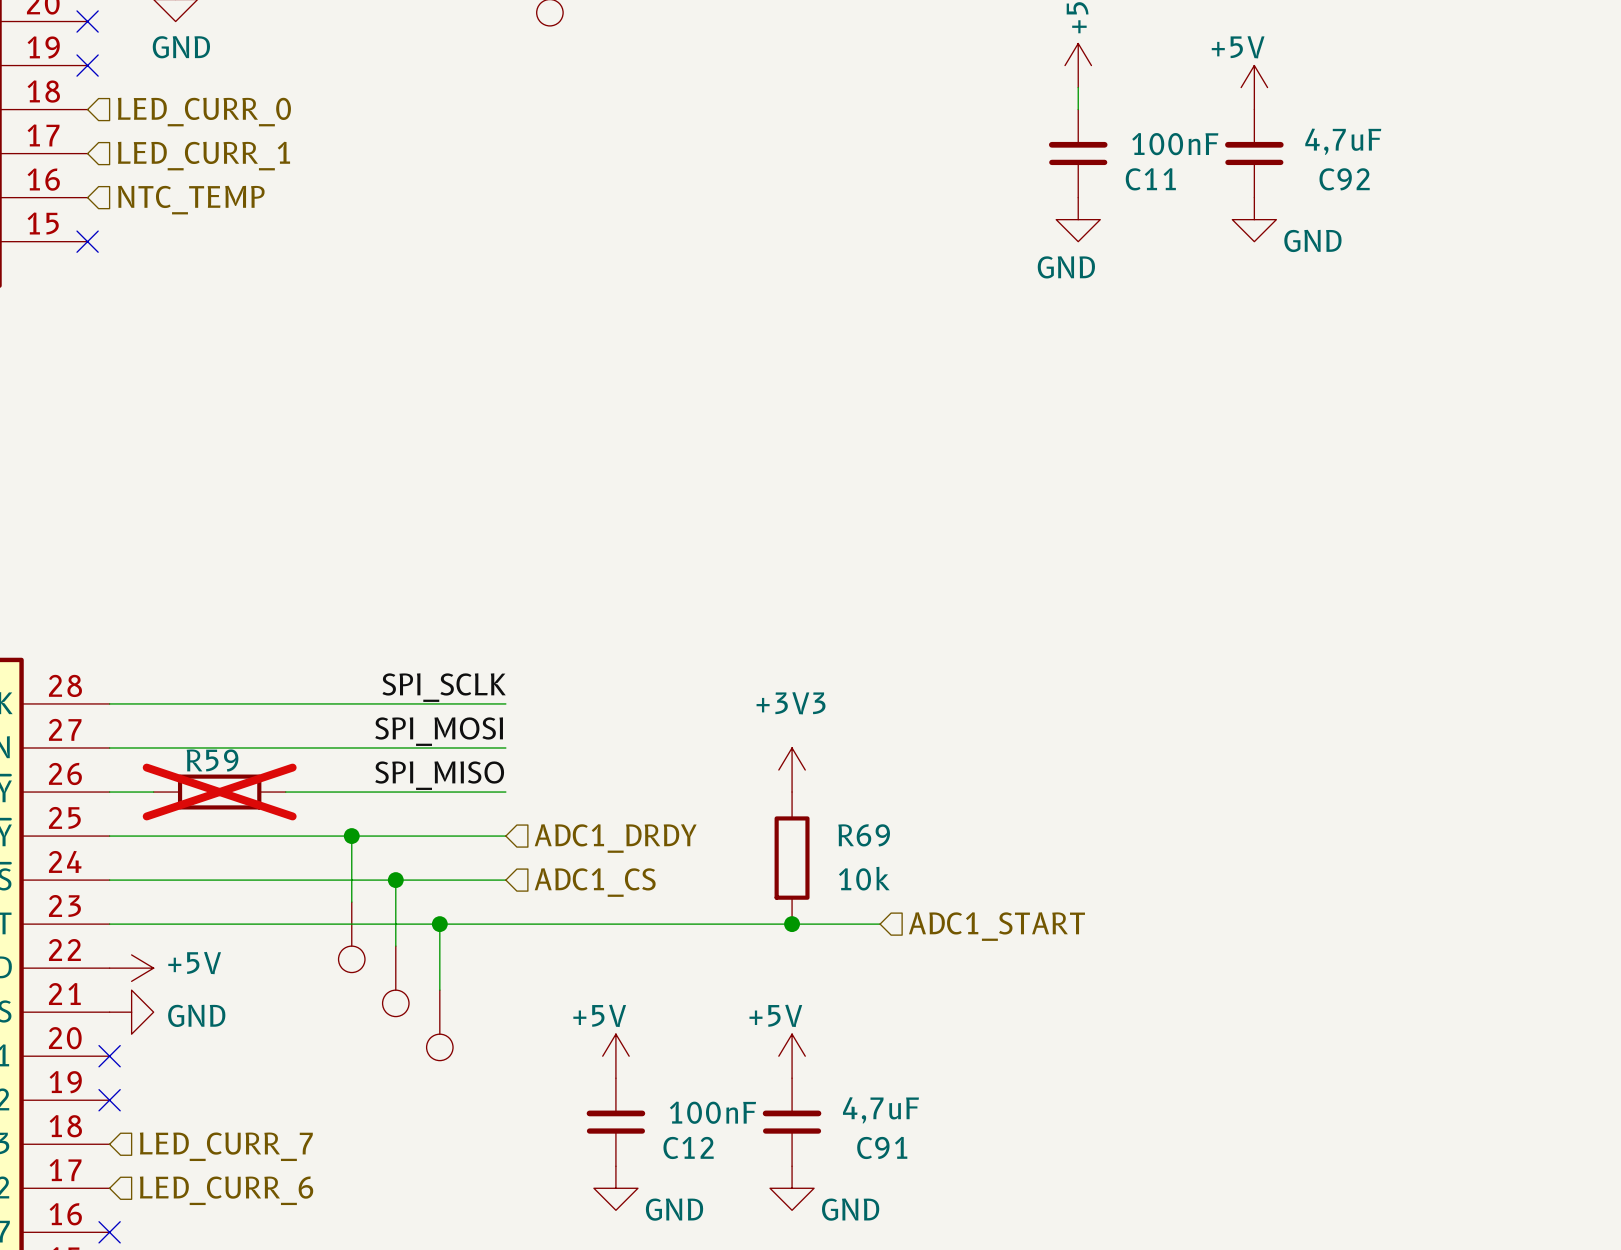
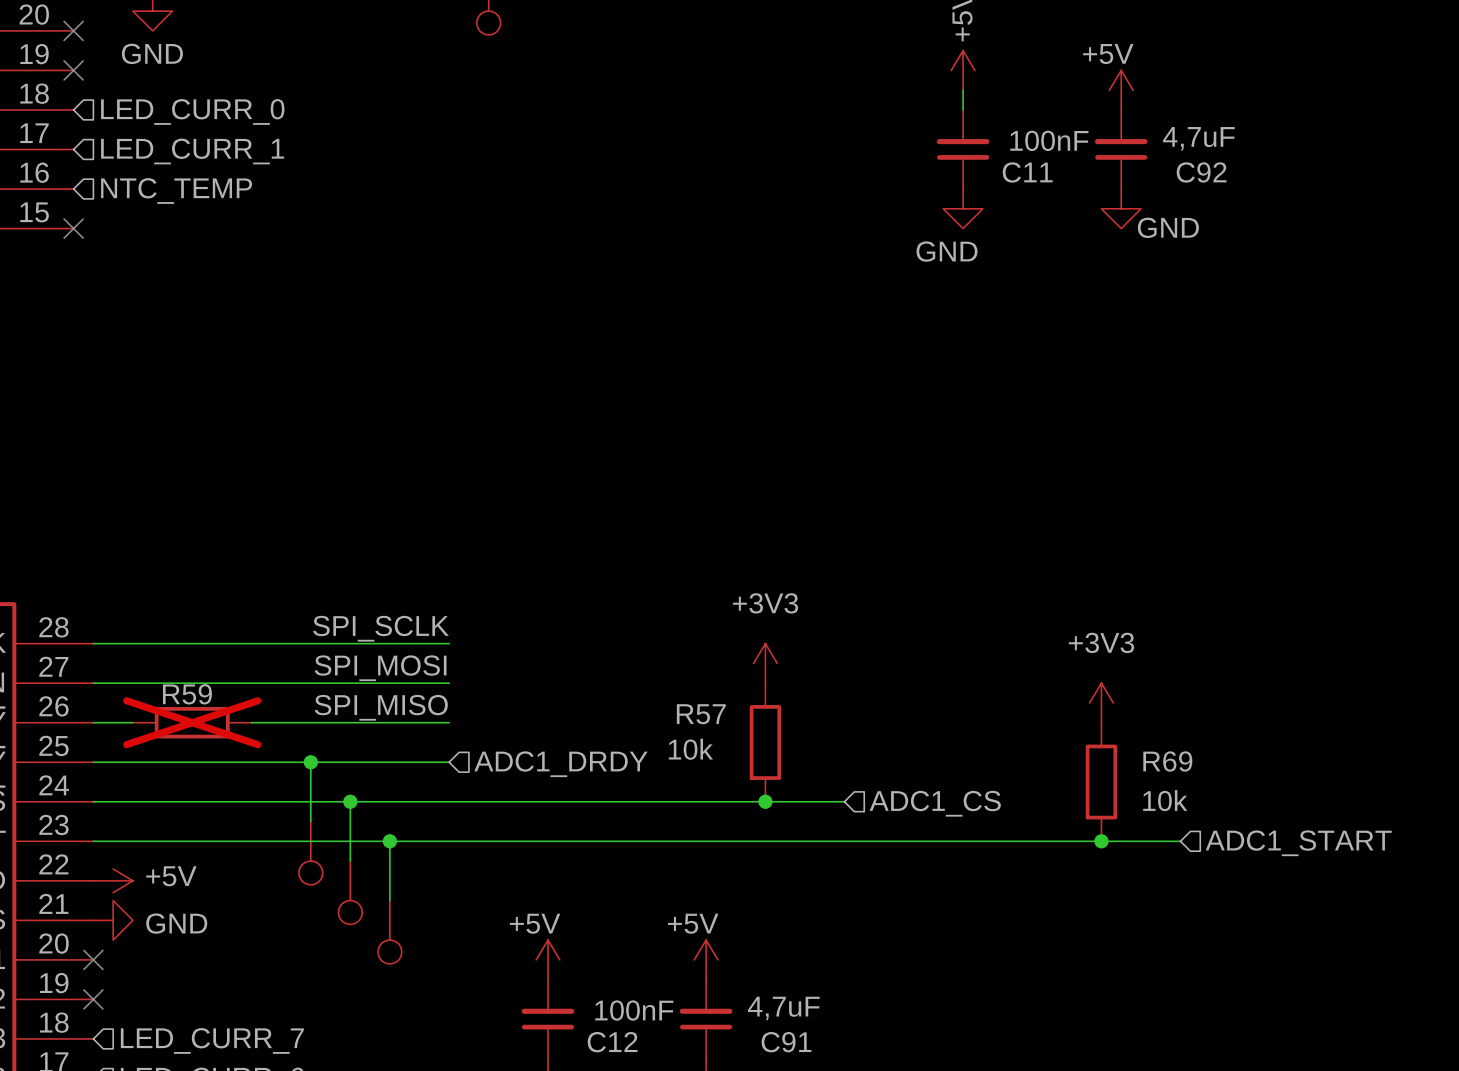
power symbol position: +3V3 (792, 770) -> +3V3 (765, 663)
power symbol: none -> +3V3 (1101, 702)
R57: none -> 10k (765, 742)
R69 position: (792, 858) -> (1101, 782)
wire: none -> (449, 801) (844, 801)
hierarchical label: ADC1_CS (595, 882) -> none
junction position: (792, 924) -> (765, 801)
wire: none -> (785, 841) (1180, 841)
junction: none -> (1101, 841)
hierarchical label: ADC1_START (996, 926) -> ADC1_CS (935, 803)
hierarchical label: none -> ADC1_START (1298, 843)

